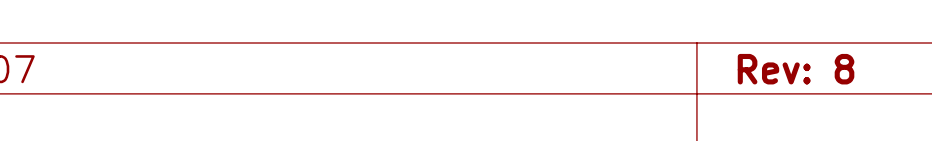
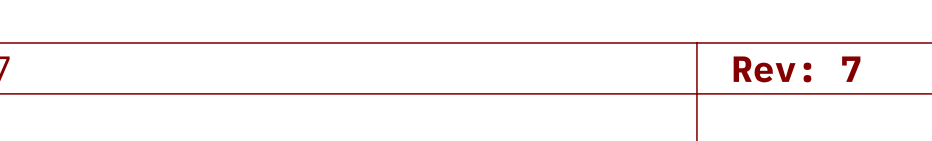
title block: Rev: 8 (796, 69) -> Rev: 7 (797, 69)

